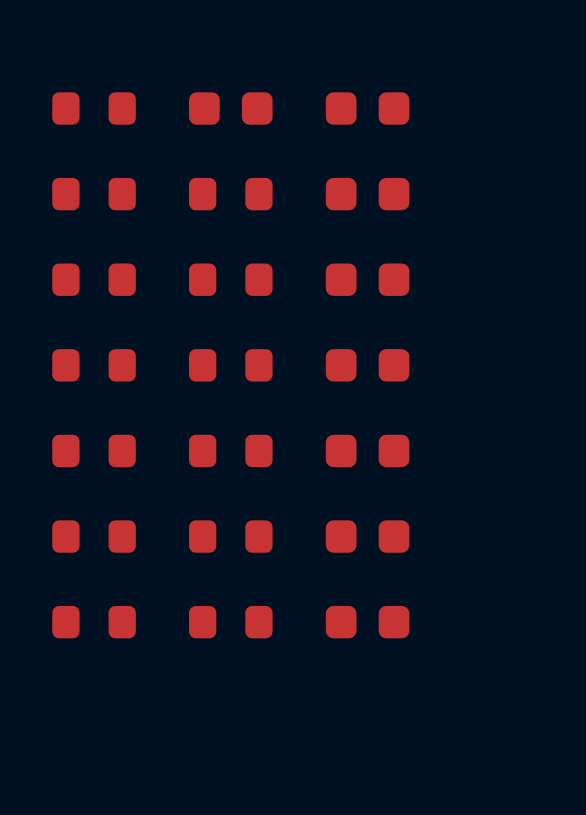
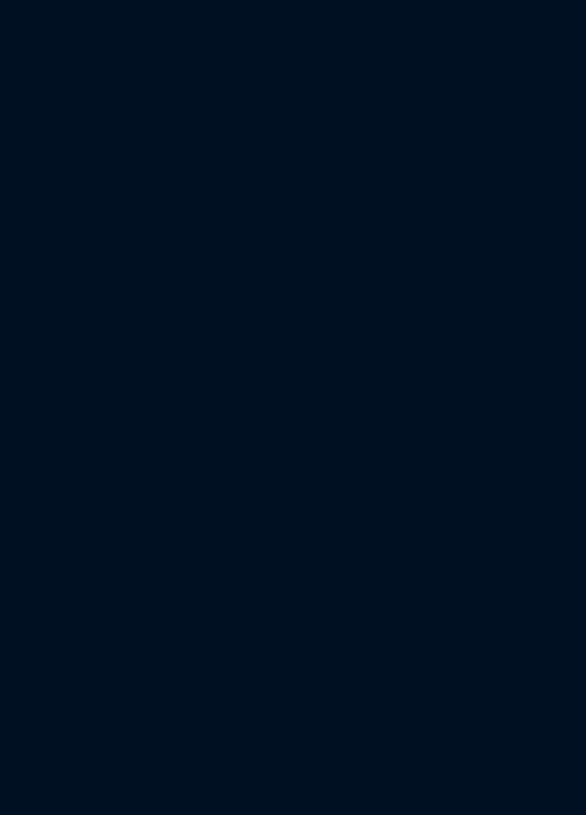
part: (94, 108) -> none
part: (230, 108) -> none
part: (367, 108) -> none
part: (94, 194) -> none
part: (230, 194) -> none
part: (367, 194) -> none
part: (94, 279) -> none
part: (230, 279) -> none
part: (367, 279) -> none
part: (94, 365) -> none
part: (230, 365) -> none
part: (367, 365) -> none
part: (94, 450) -> none
part: (230, 450) -> none
part: (367, 450) -> none
part: (94, 536) -> none
part: (230, 536) -> none
part: (367, 536) -> none
part: (94, 622) -> none
part: (230, 622) -> none
part: (367, 622) -> none

